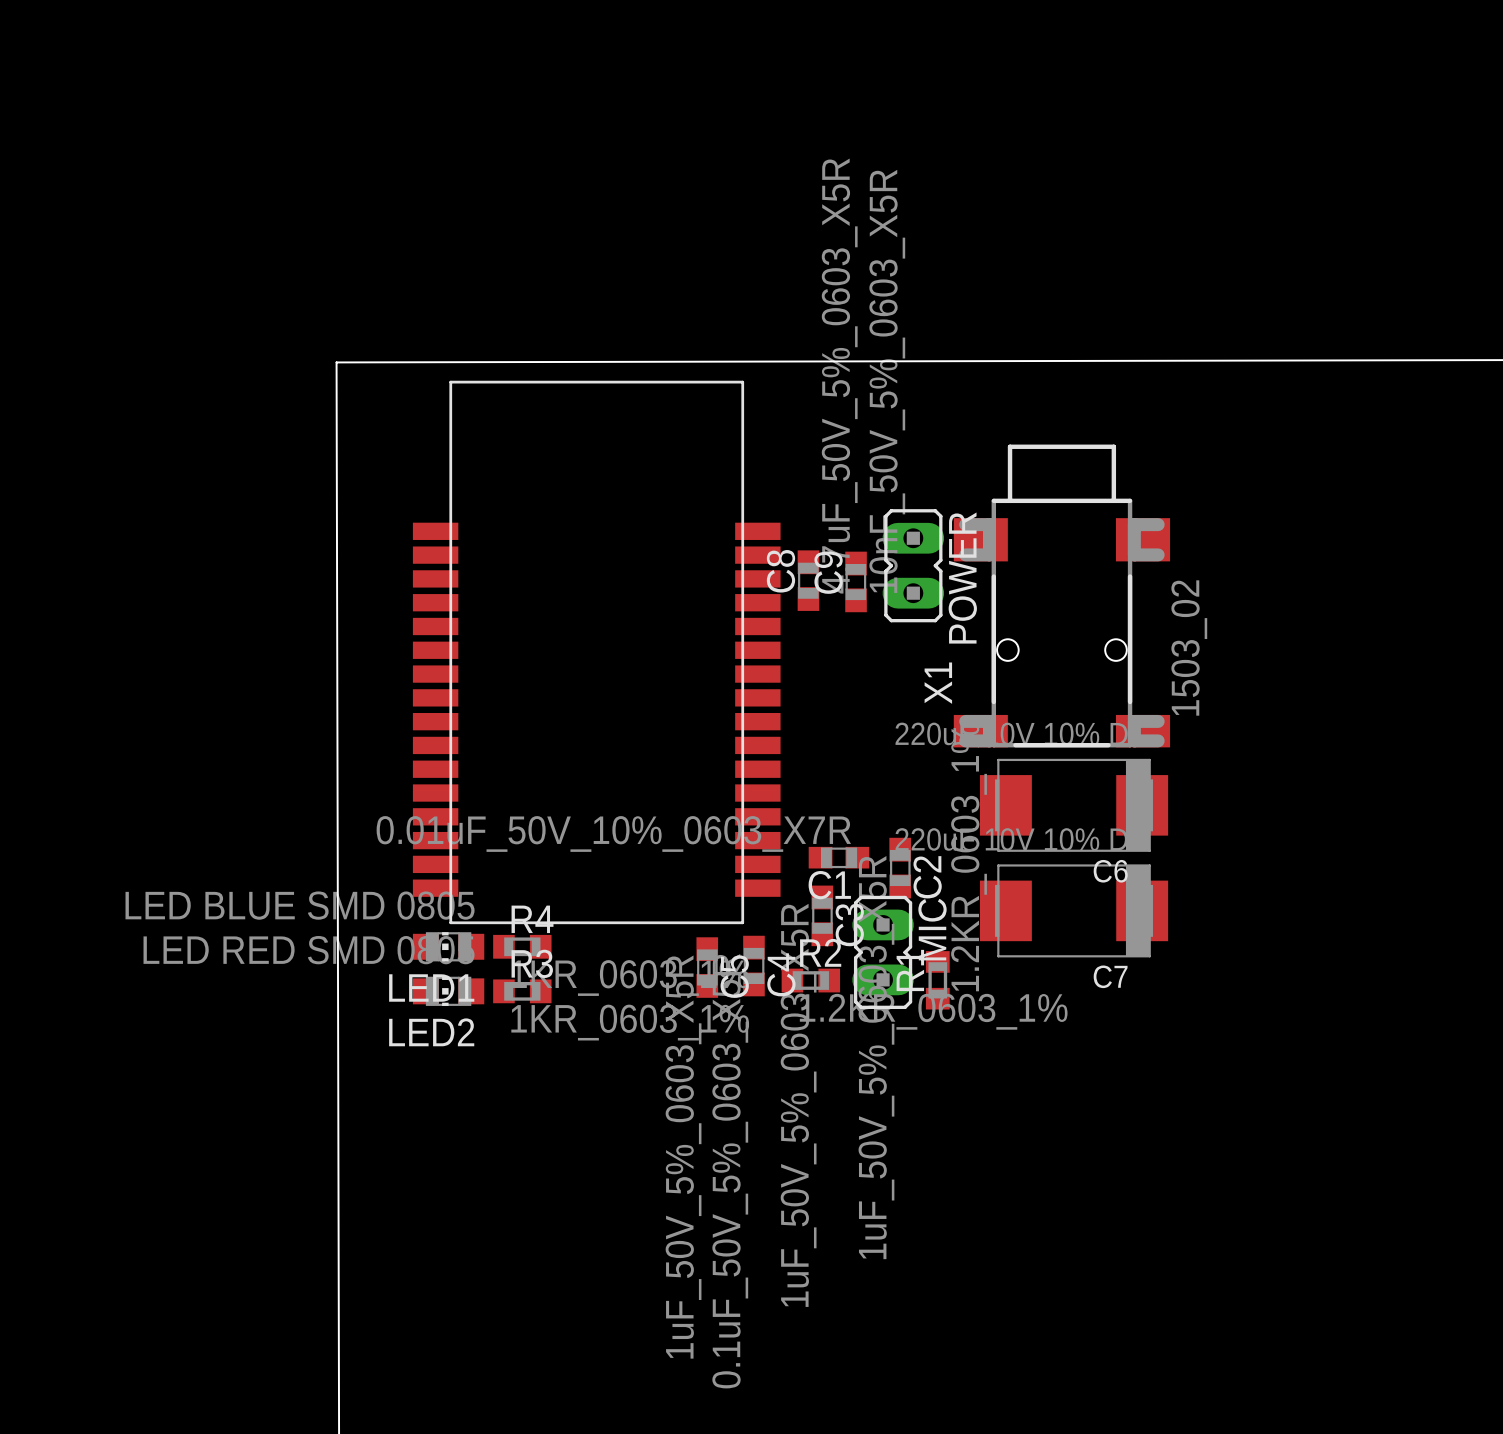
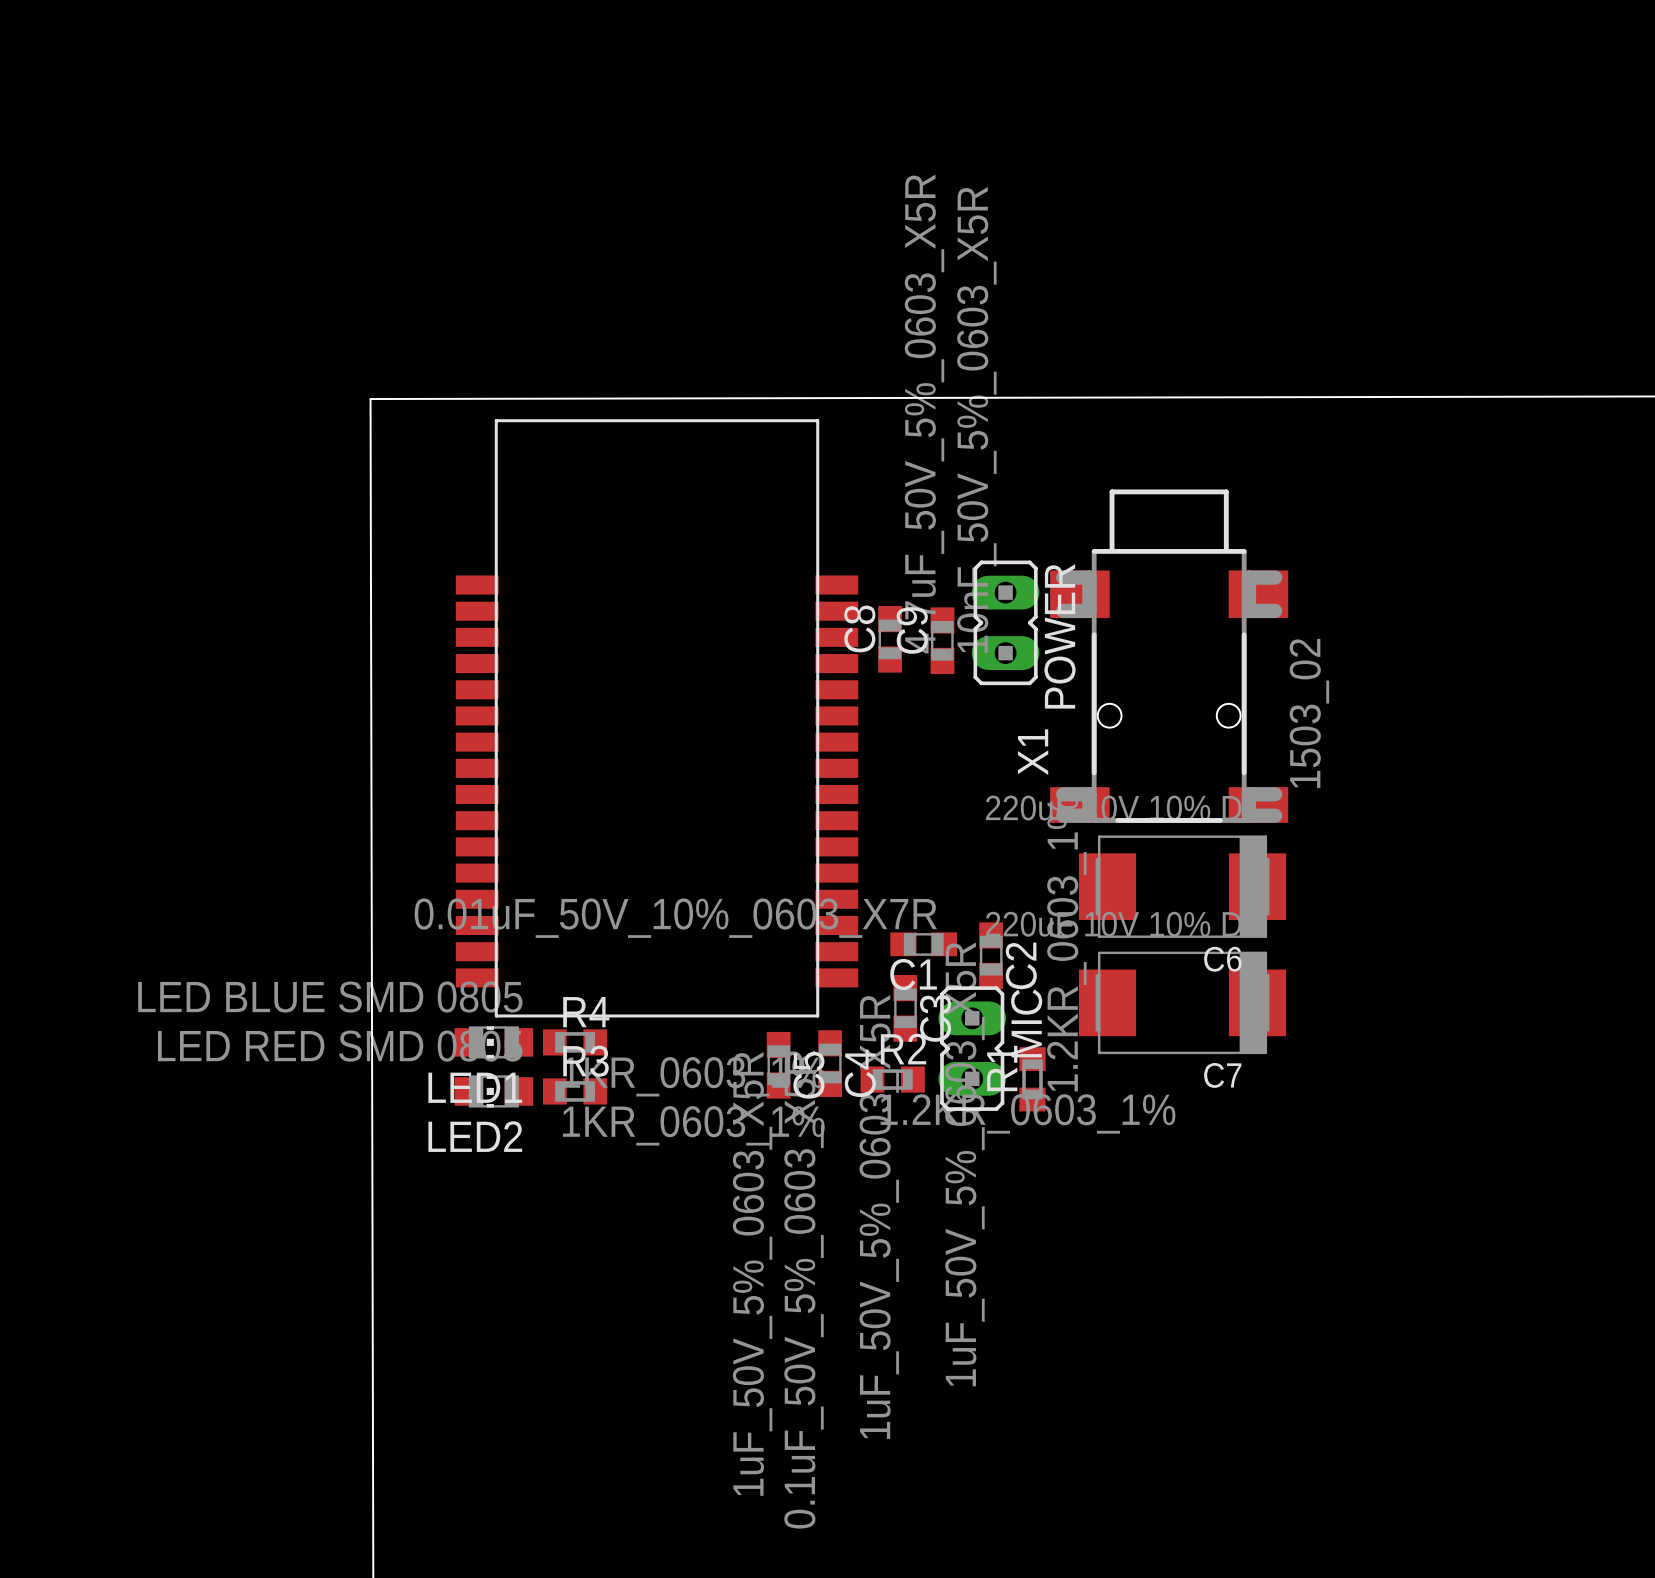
part footprint: [412, 380, 781, 925] -> [455, 419, 859, 1018]

